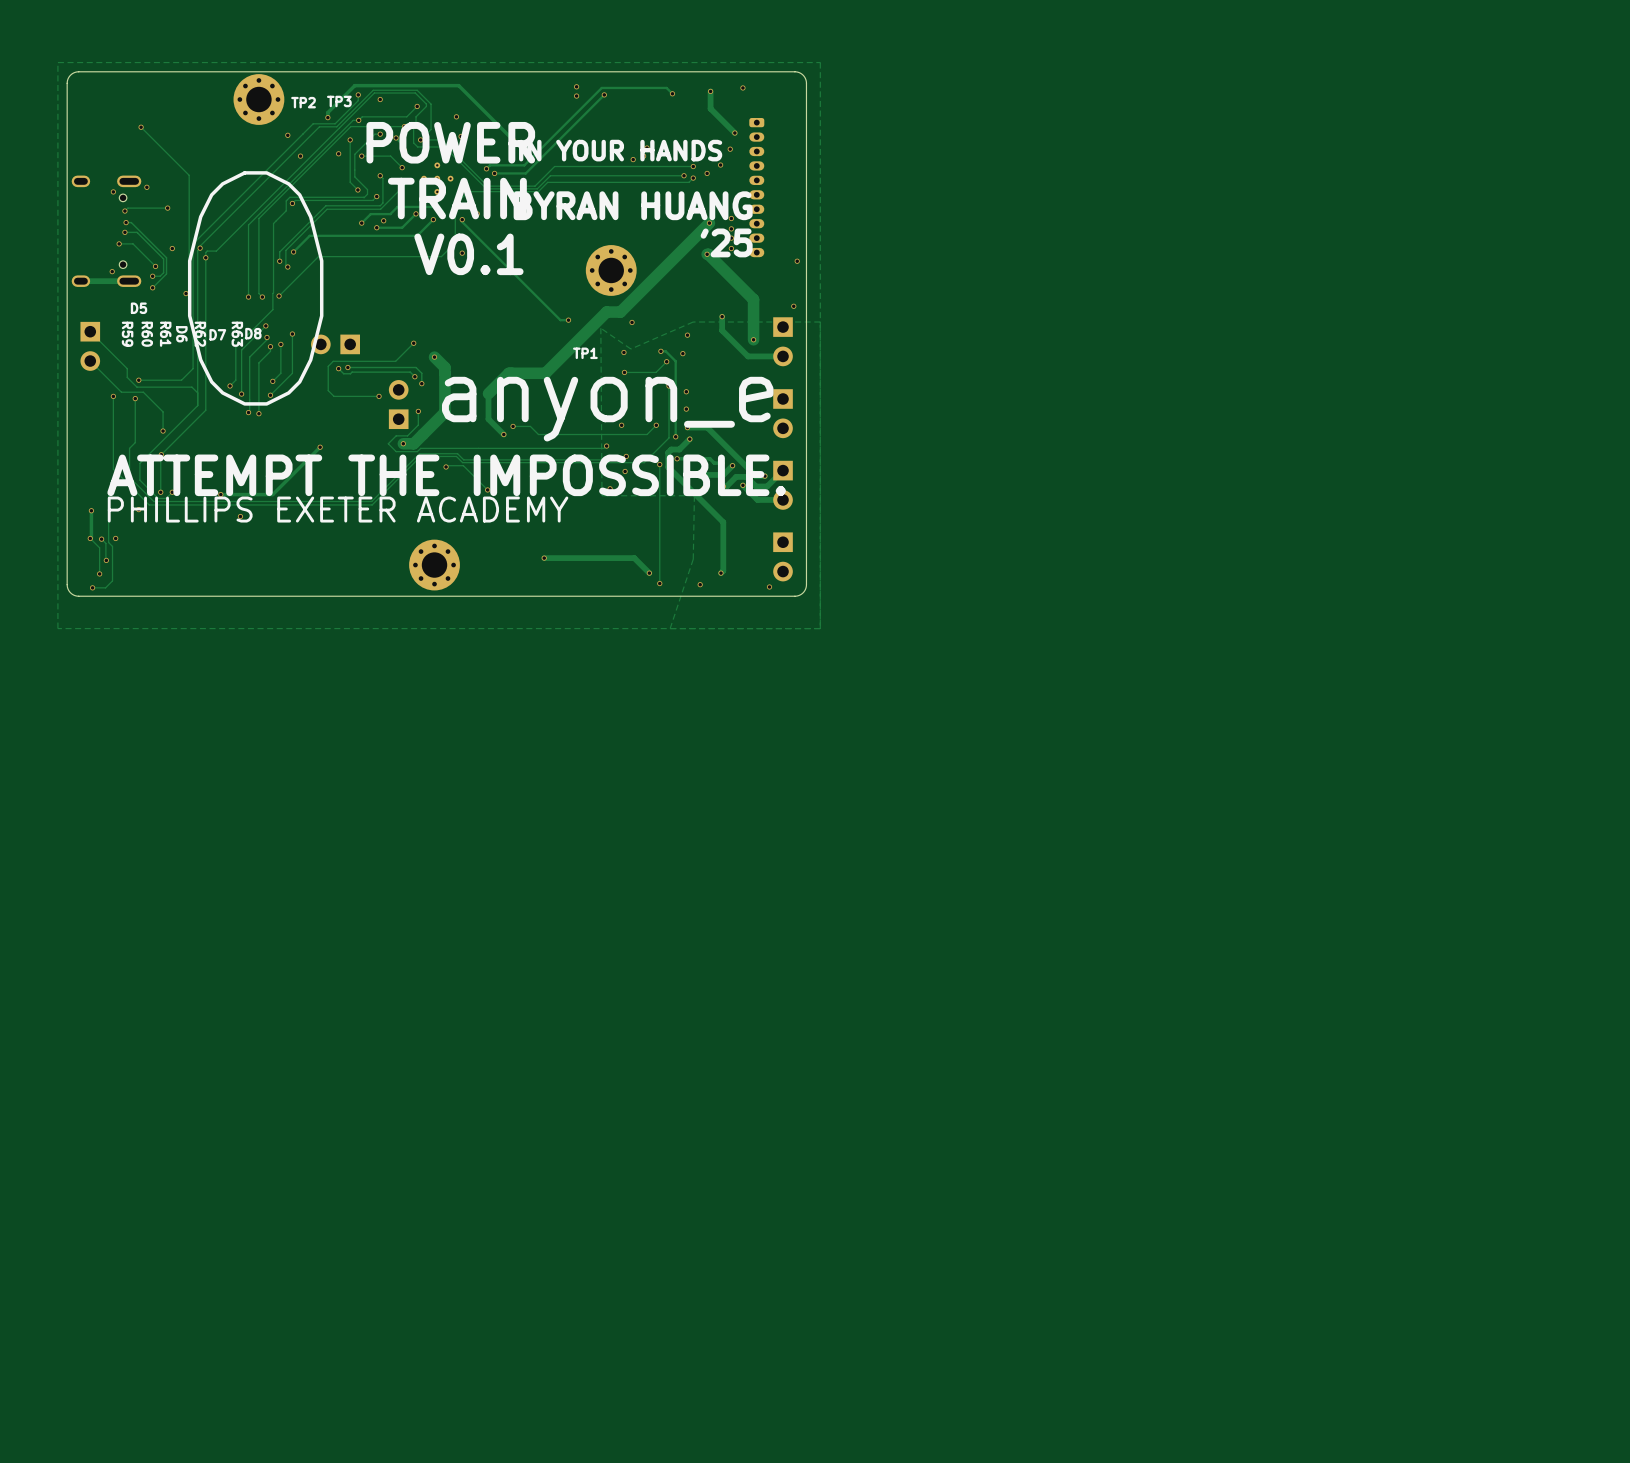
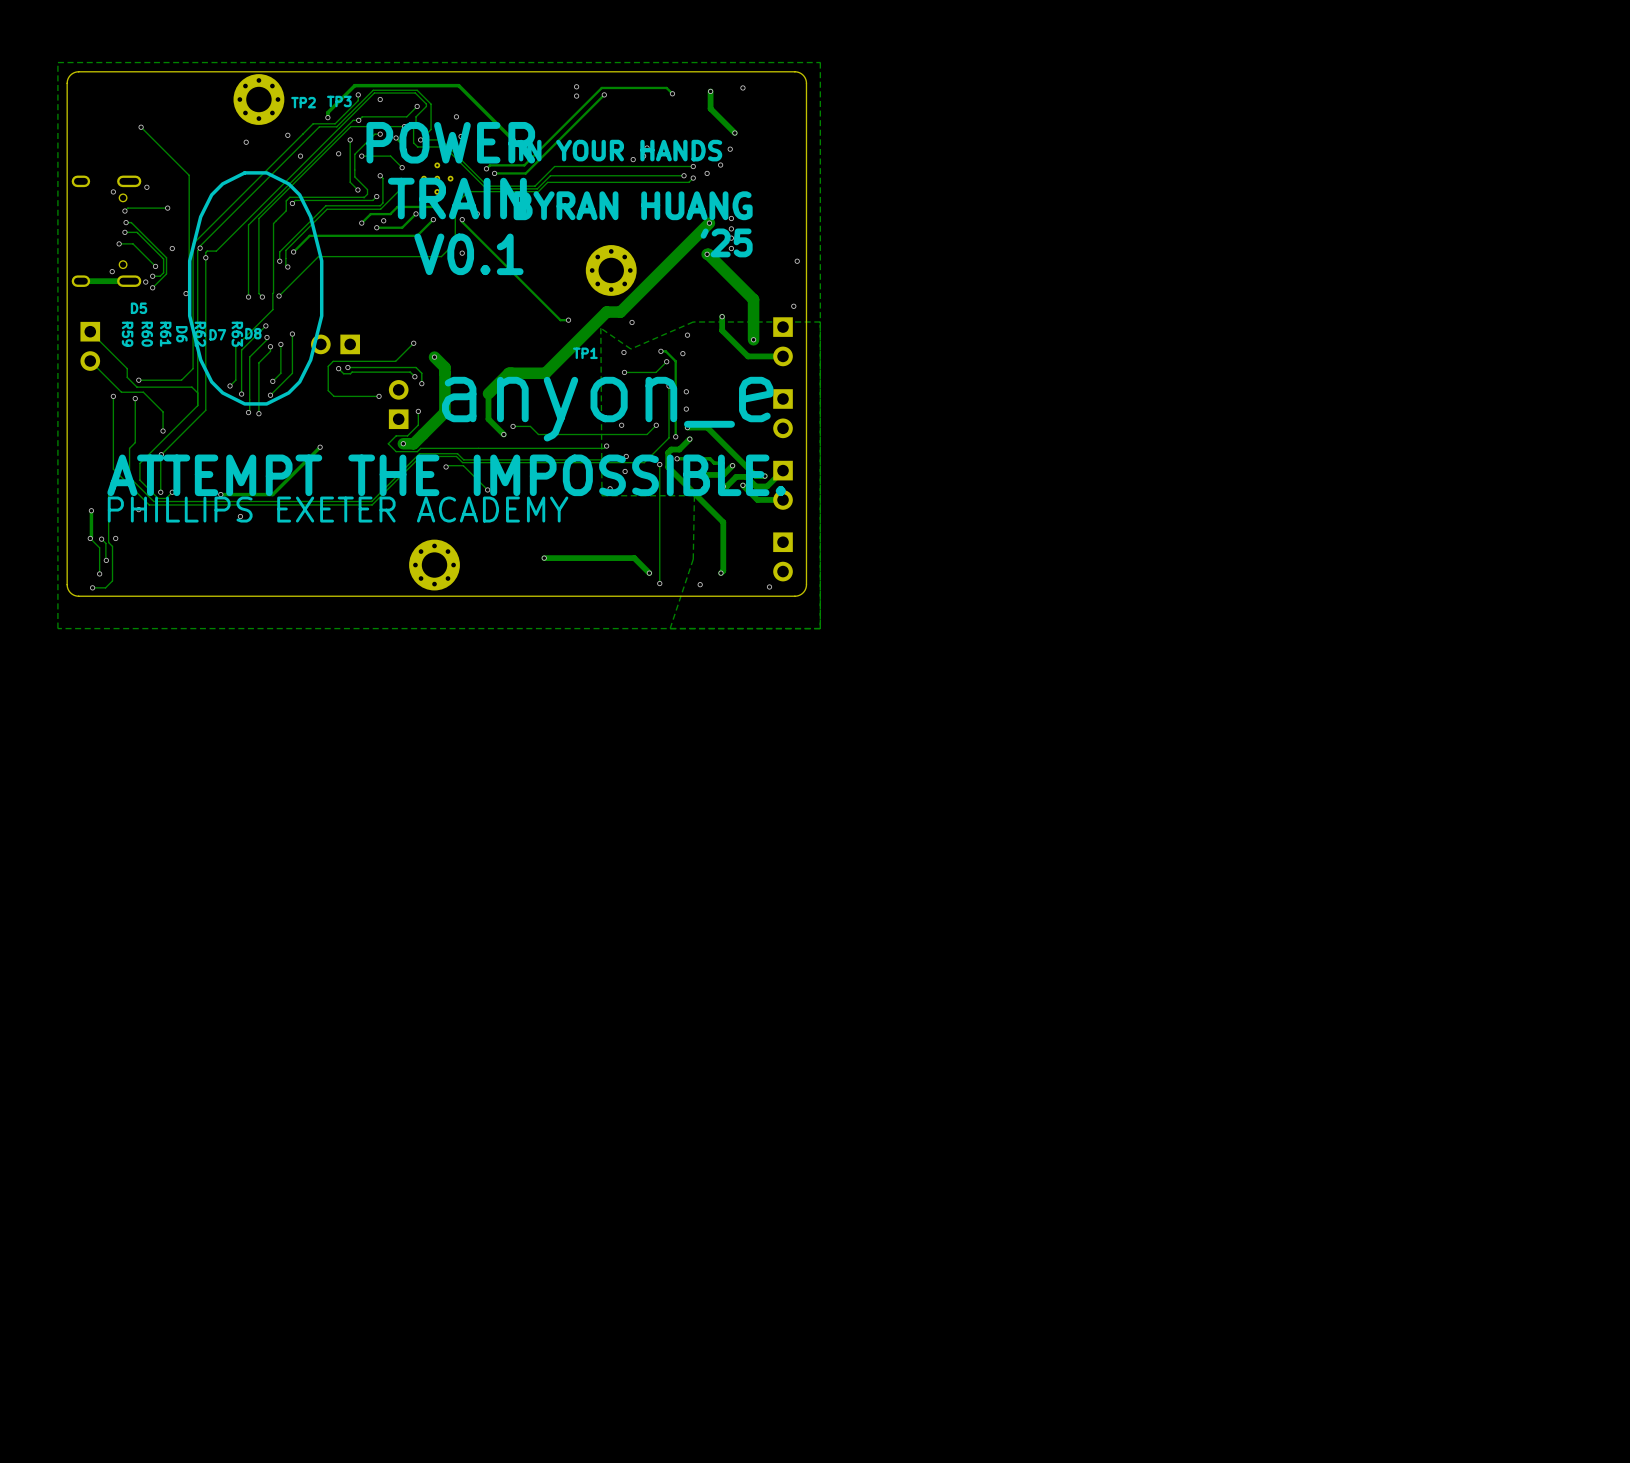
via: none -> (246, 142)
part: (756, 187) -> none
via: none -> (145, 282)

